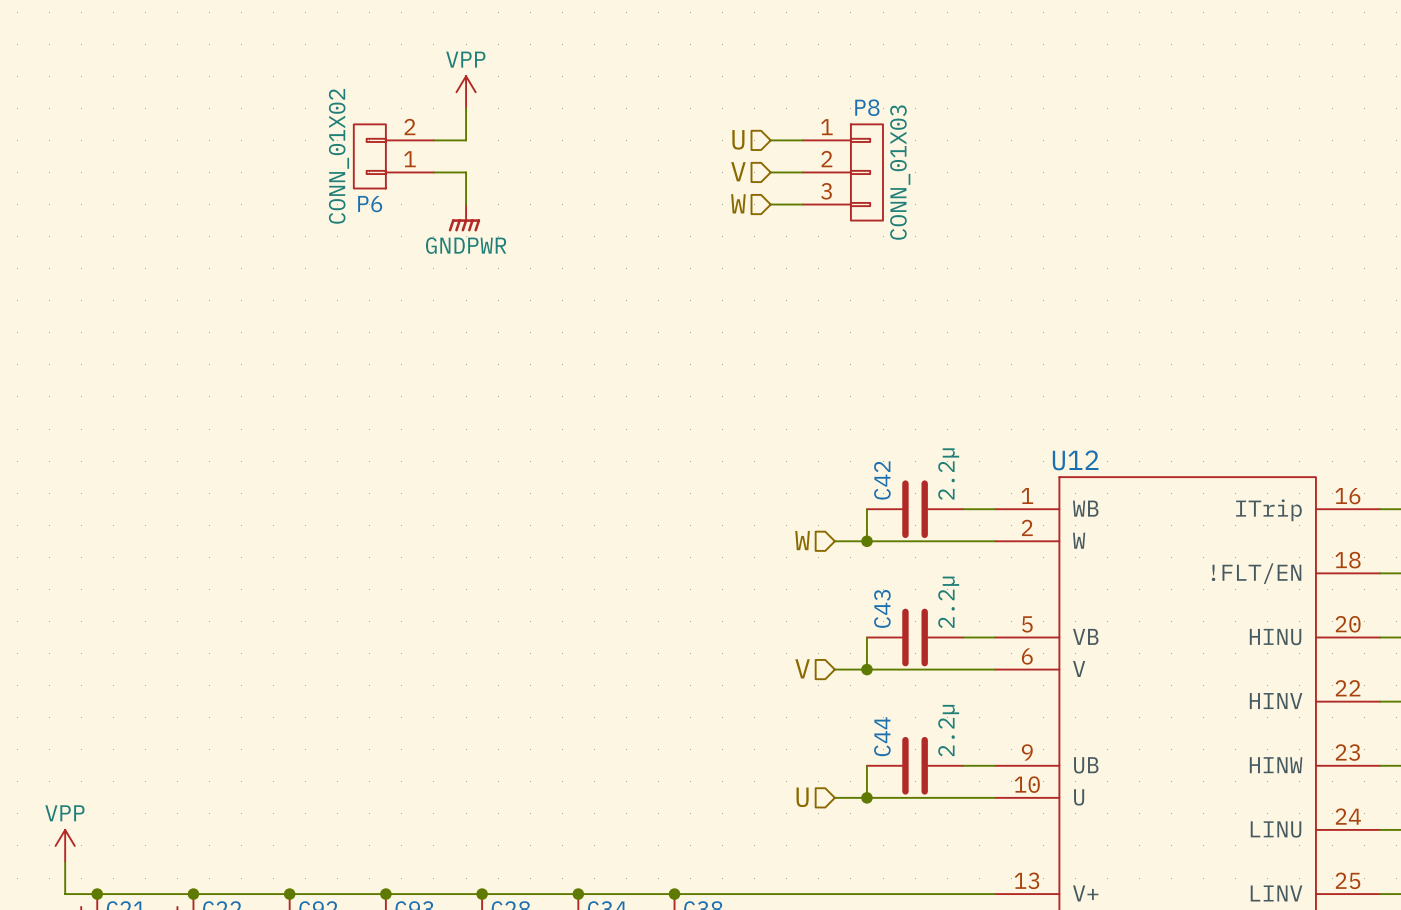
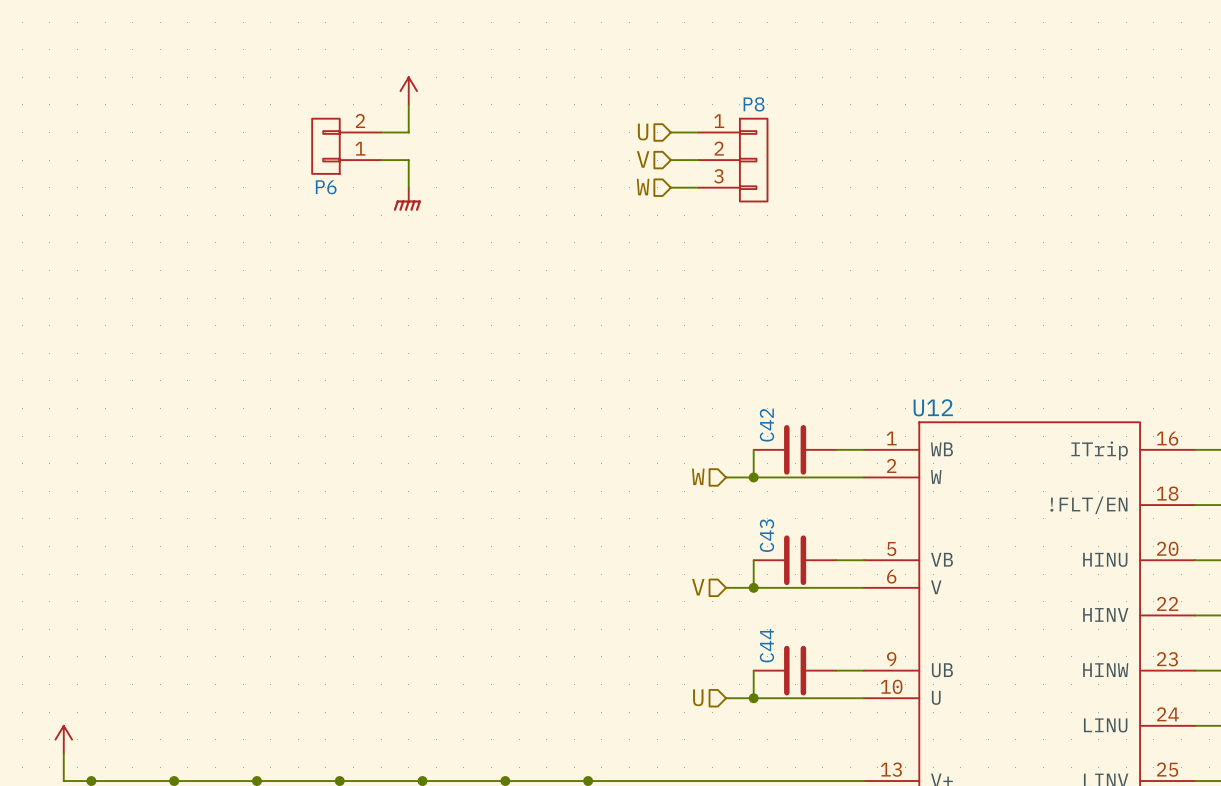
power symbol text: VPP (465, 59) -> none
P6 value: CONN_01X02 (338, 156) -> none
P8 value: CONN_01X03 (900, 172) -> none
power symbol text: GNDPWR (466, 245) -> none
C42 value: 2.2µ (948, 474) -> none
C43 value: 2.2µ (948, 602) -> none
C44 value: 2.2µ (948, 730) -> none
power symbol text: VPP (64, 813) -> none

